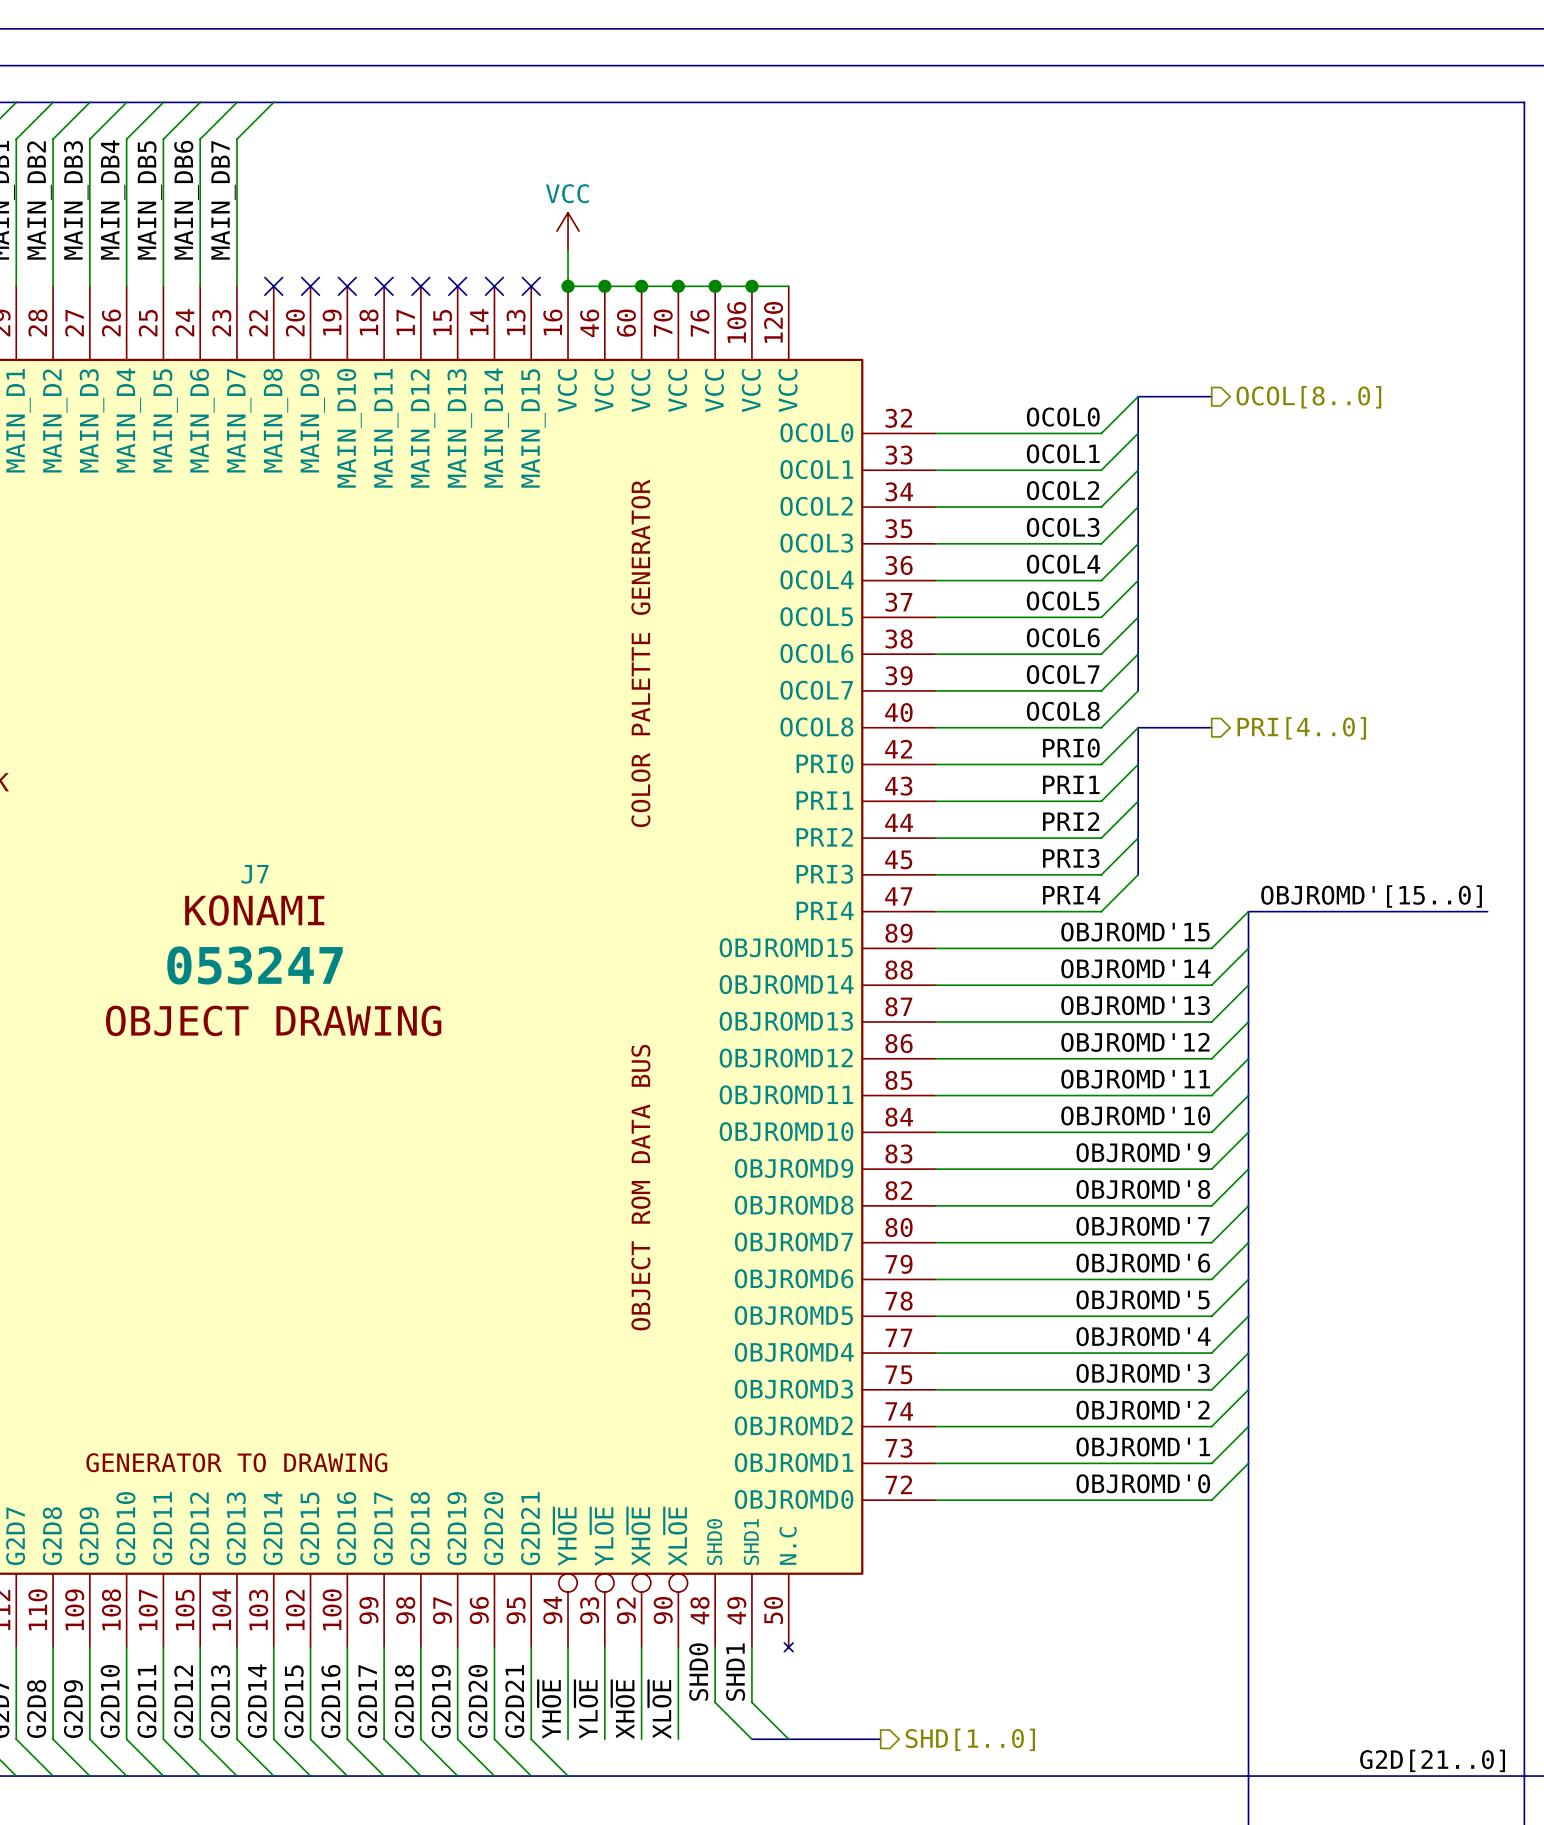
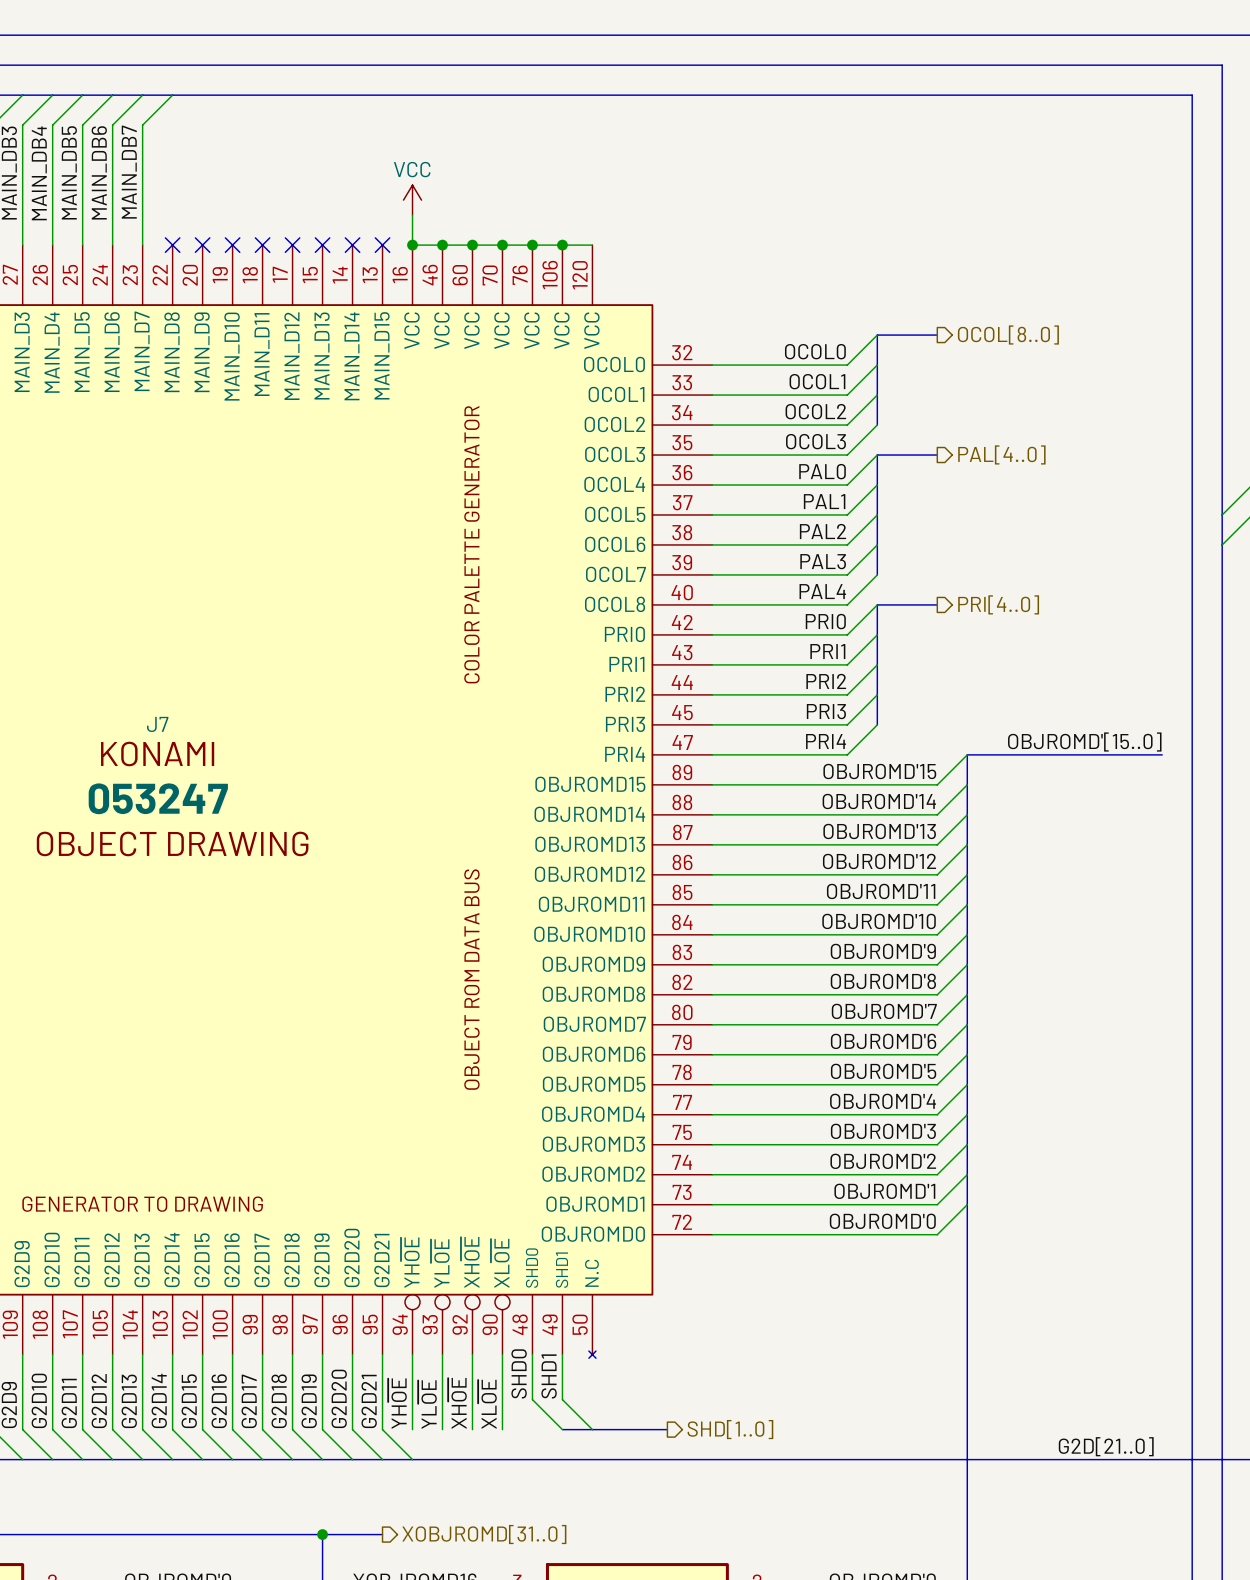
bus: (1138, 507) (1138, 543) -> (937, 455) (877, 455)
hierarchical label: none -> PAL[4..0] (1001, 454)
label: OCOL4 (1063, 564) -> PAL0 (822, 471)
label: OCOL5 (1063, 600) -> PAL1 (824, 501)
label: OCOL6 (1063, 637) -> PAL2 (822, 531)
label: OCOL7 (1063, 674) -> PAL3 (823, 561)
label: OCOL8 (1063, 711) -> PAL4 (822, 591)

